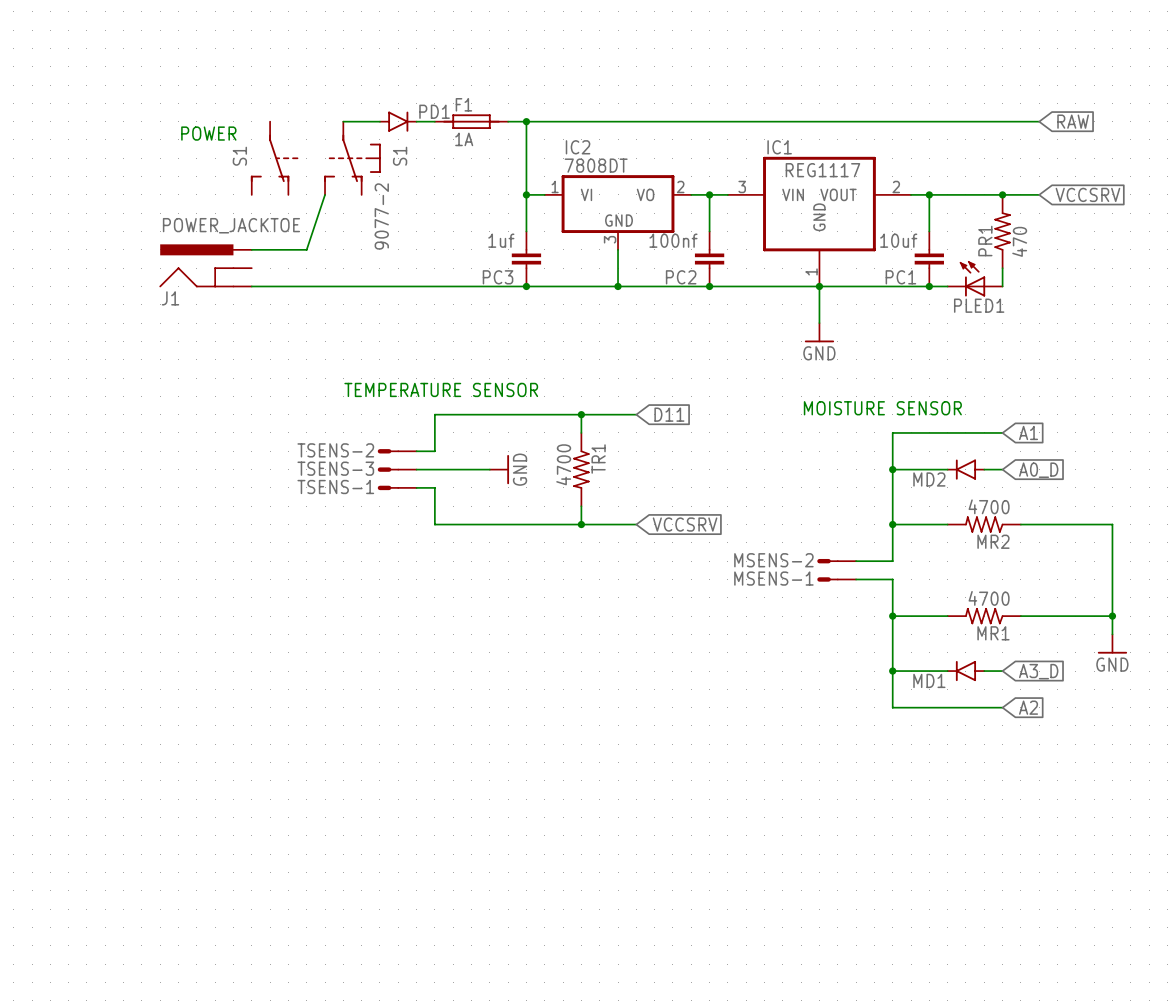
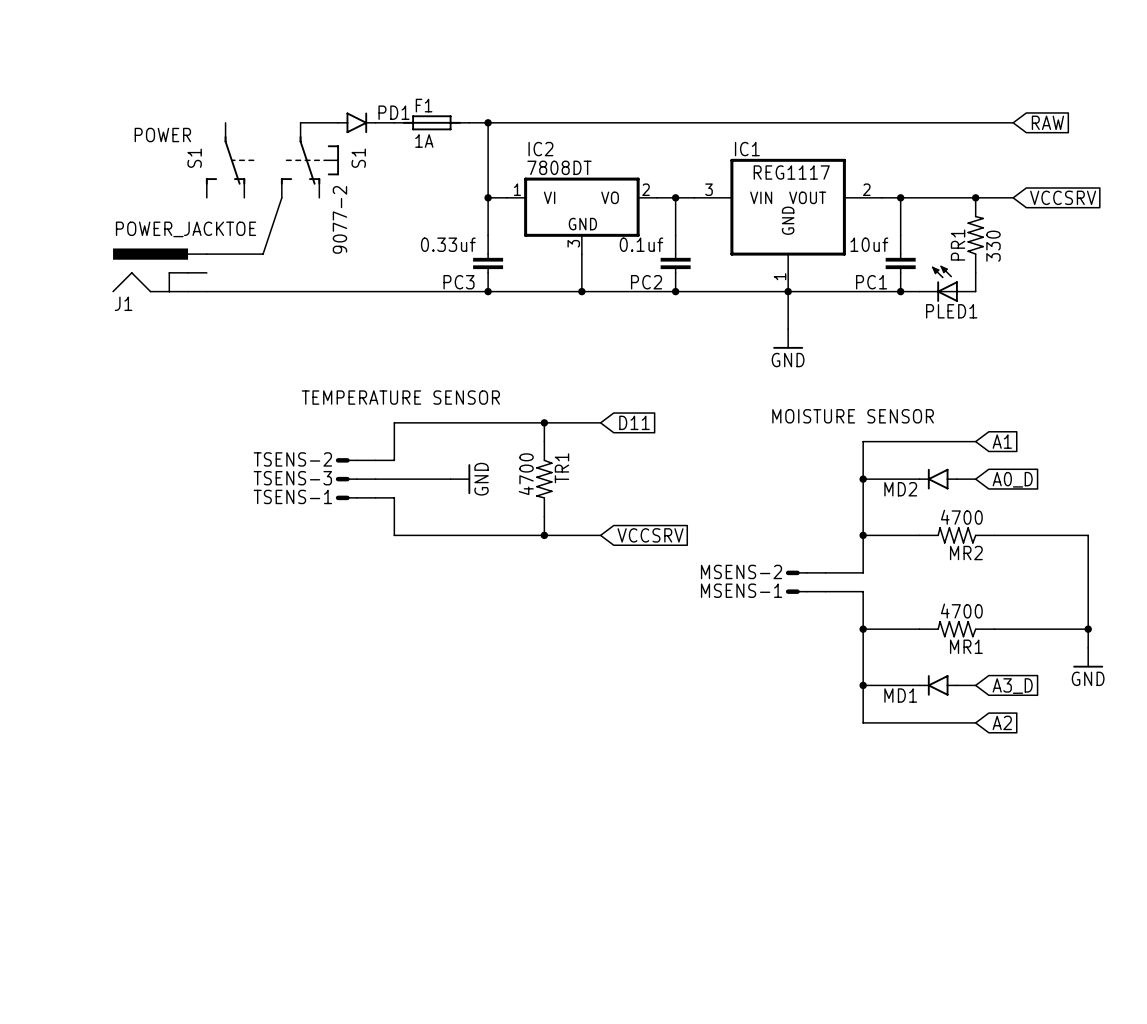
PC3 value: 1uf (501, 240) -> 0.33uf (448, 244)
PC2 value: 100nf (673, 240) -> 0.1uf (641, 244)
PR1 value: 470 (1019, 241) -> 330 (993, 246)

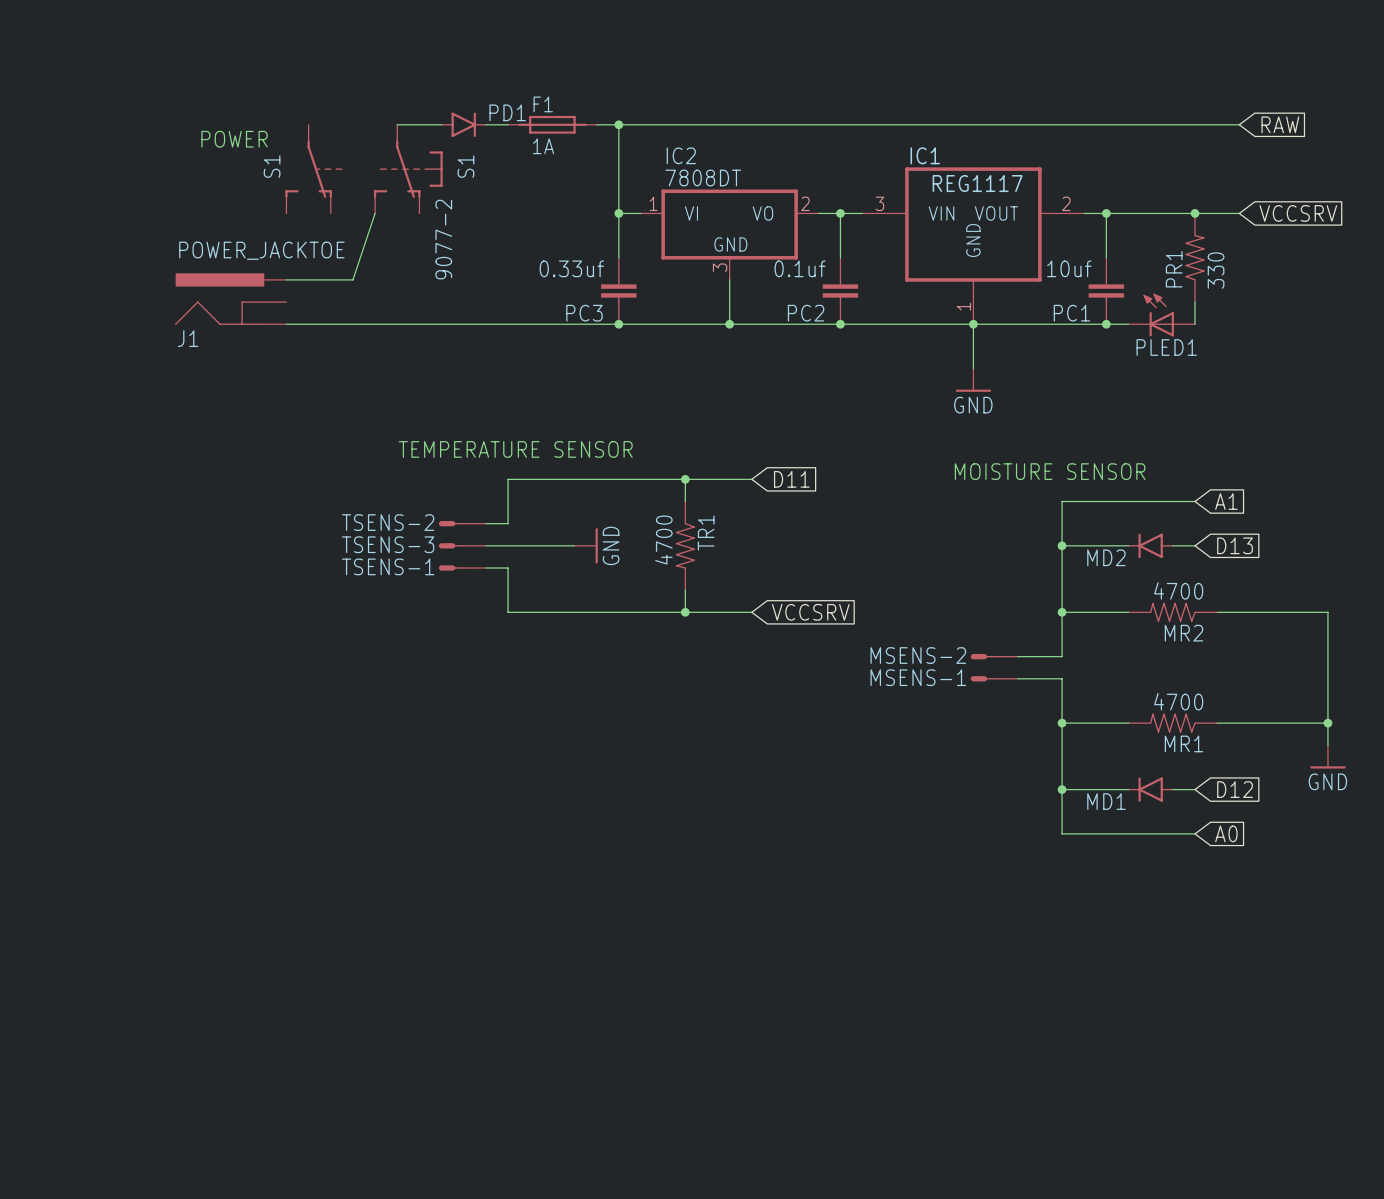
global label: A0_D (1012, 479) -> D13 (1235, 545)
global label: A3_D (1012, 686) -> D12 (1235, 789)
global label: A2 (1002, 722) -> A0 (1226, 833)

